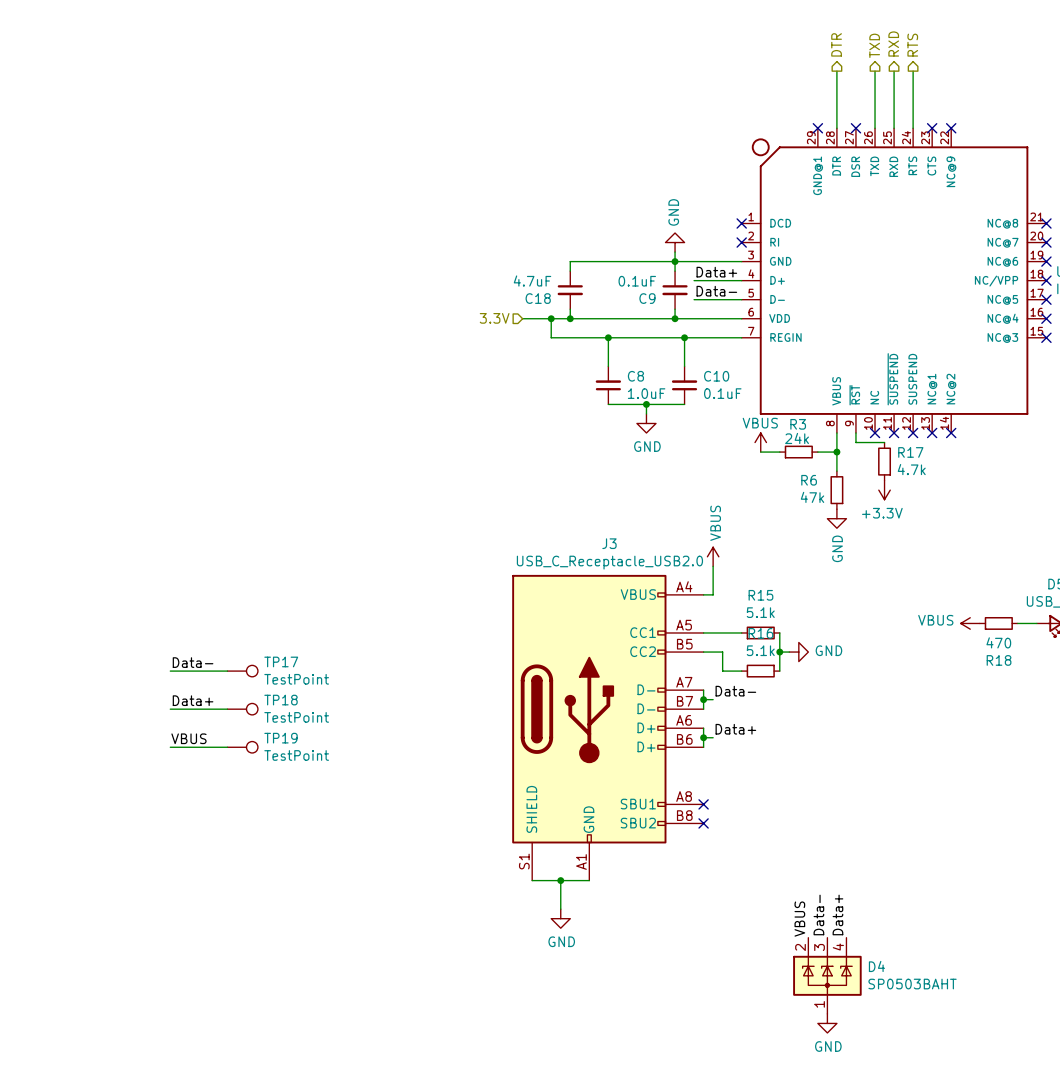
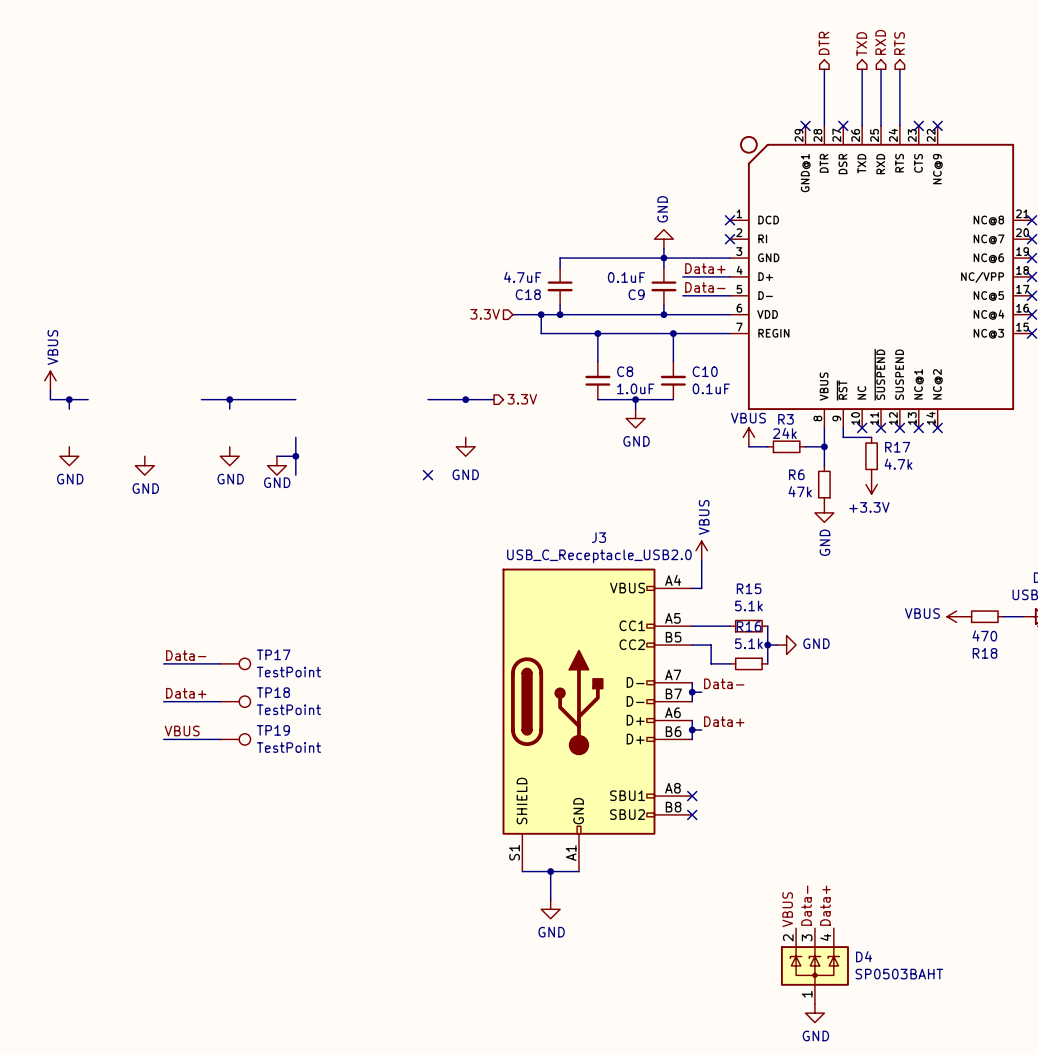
power symbol: none -> VBUS (50, 380)
wire: none -> (50, 390) (50, 399) (88, 399)
wire: none -> (69, 399) (69, 409)
junction: none -> (69, 399)
wire: none -> (201, 399) (295, 399)
wire: none -> (229, 399) (229, 409)
junction: none -> (229, 399)
wire: none -> (427, 399) (494, 399)
junction: none -> (465, 399)
hierarchical label: none -> 3.3V (522, 399)
wire: none -> (295, 437) (295, 475)
power symbol: none -> GND (465, 446)
power symbol: none -> GND (69, 456)
power symbol: none -> GND (229, 456)
wire: none -> (276, 456) (295, 456)
junction: none -> (295, 456)
power symbol: none -> GND (144, 465)
power symbol: none -> GND (276, 465)
no-connect mark: none -> (427, 475)

